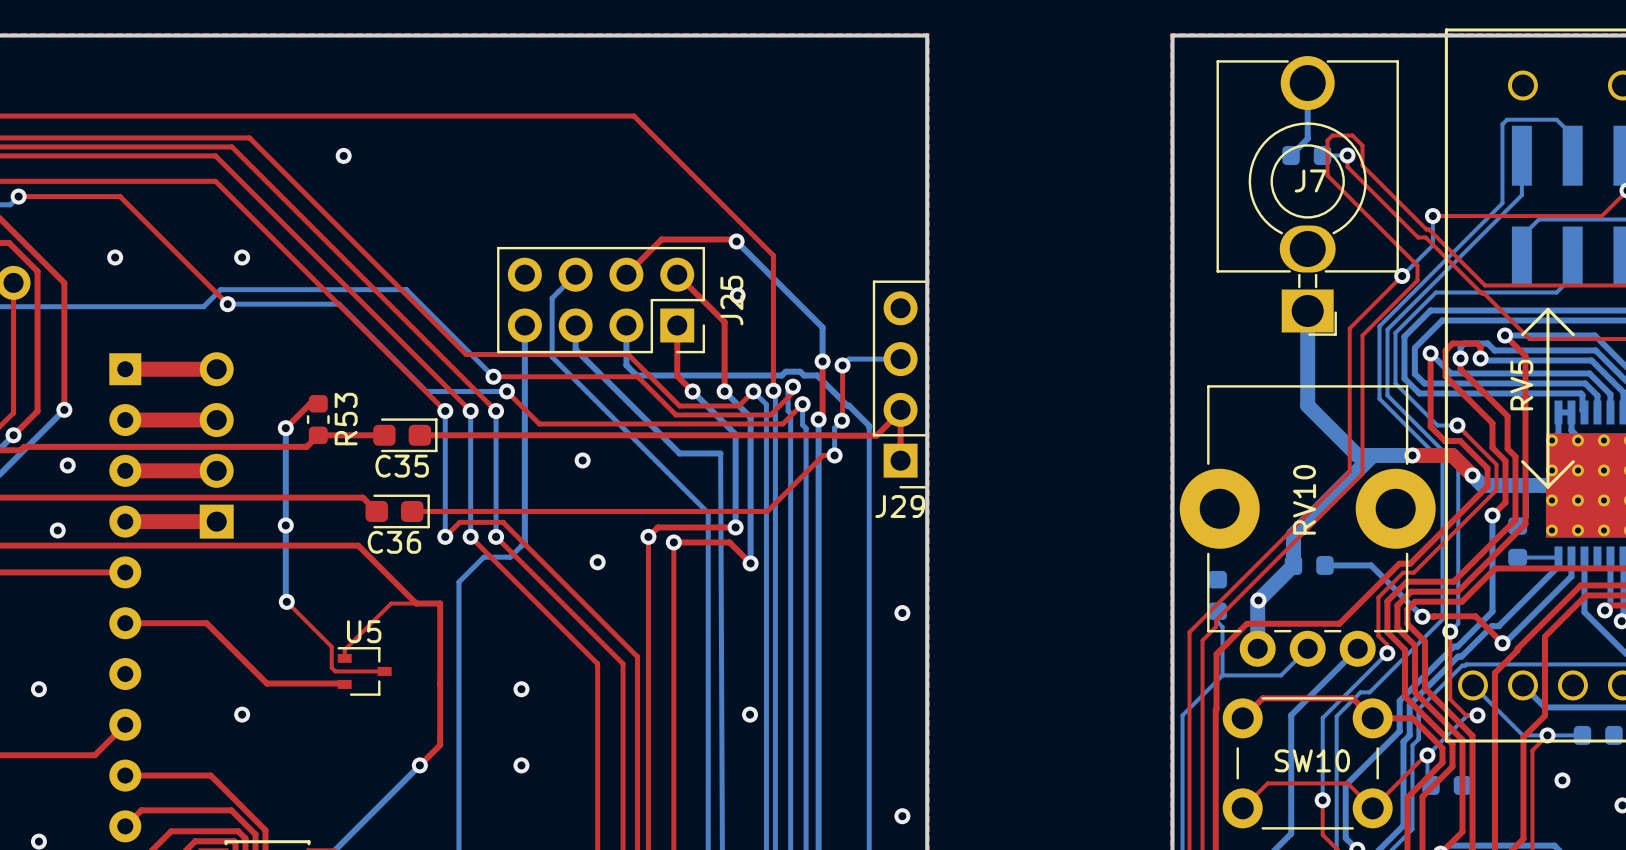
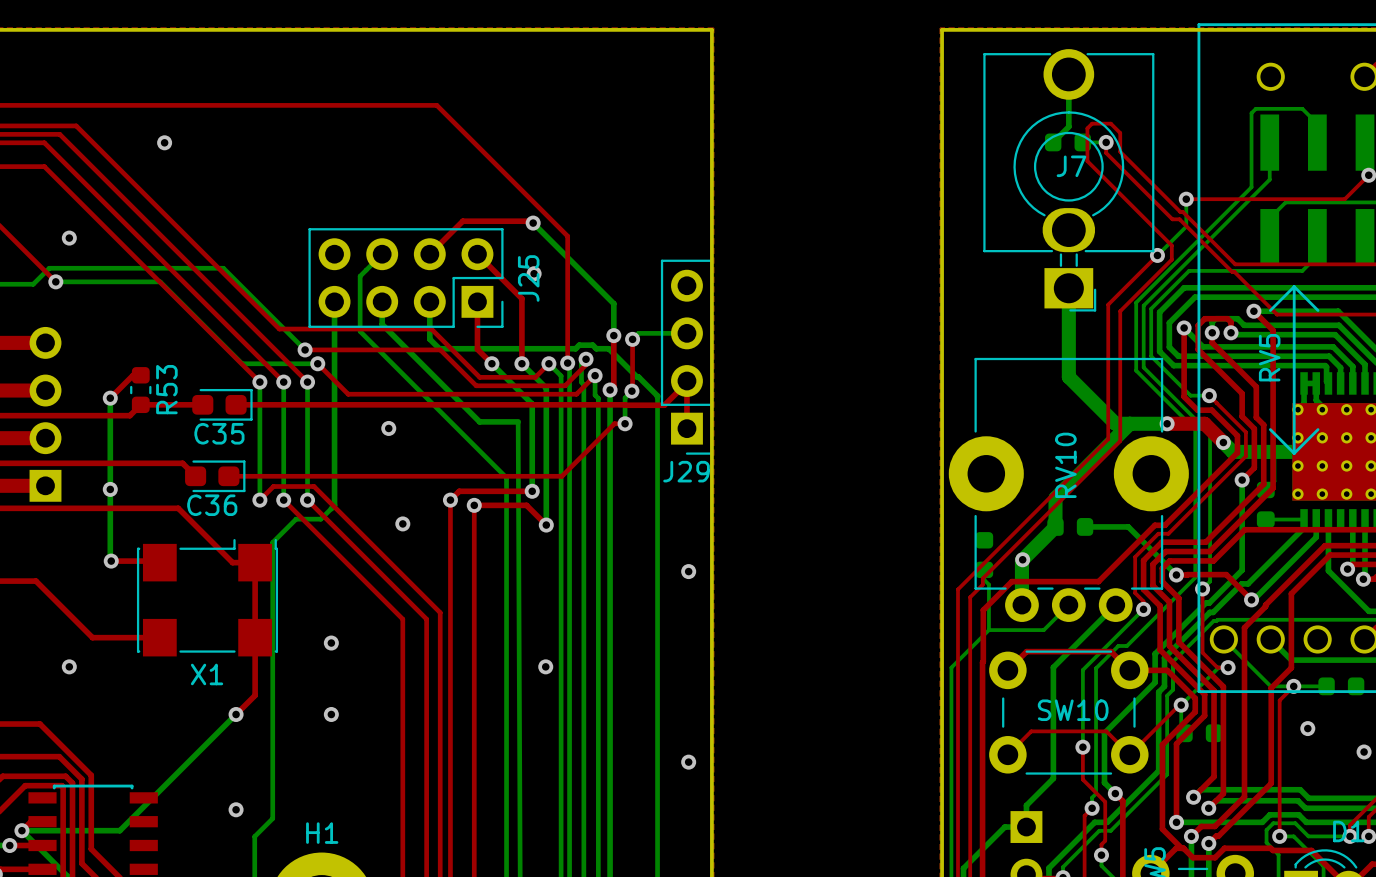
top track: (286, 601) (331, 646) (331, 667) (335, 671) (384, 671) -> (111, 561) (158, 561) (159, 562)
top track: (416, 603) (391, 603) (344, 649) (344, 658) -> none
X1: none -> (207, 597)
U5: (364, 671) -> none

